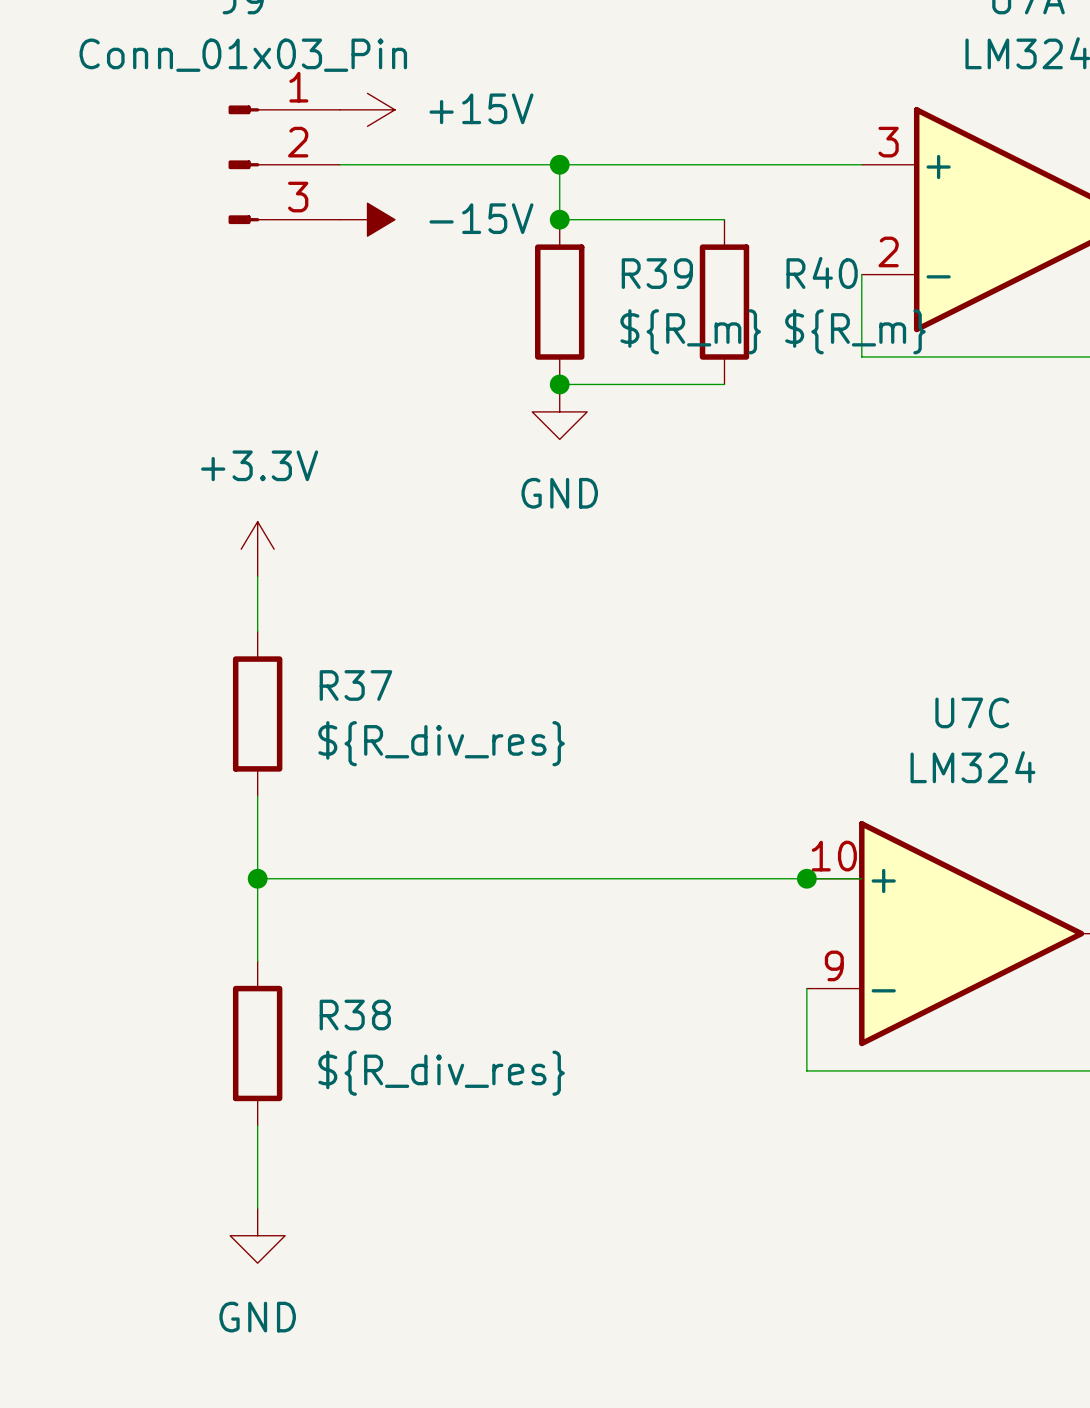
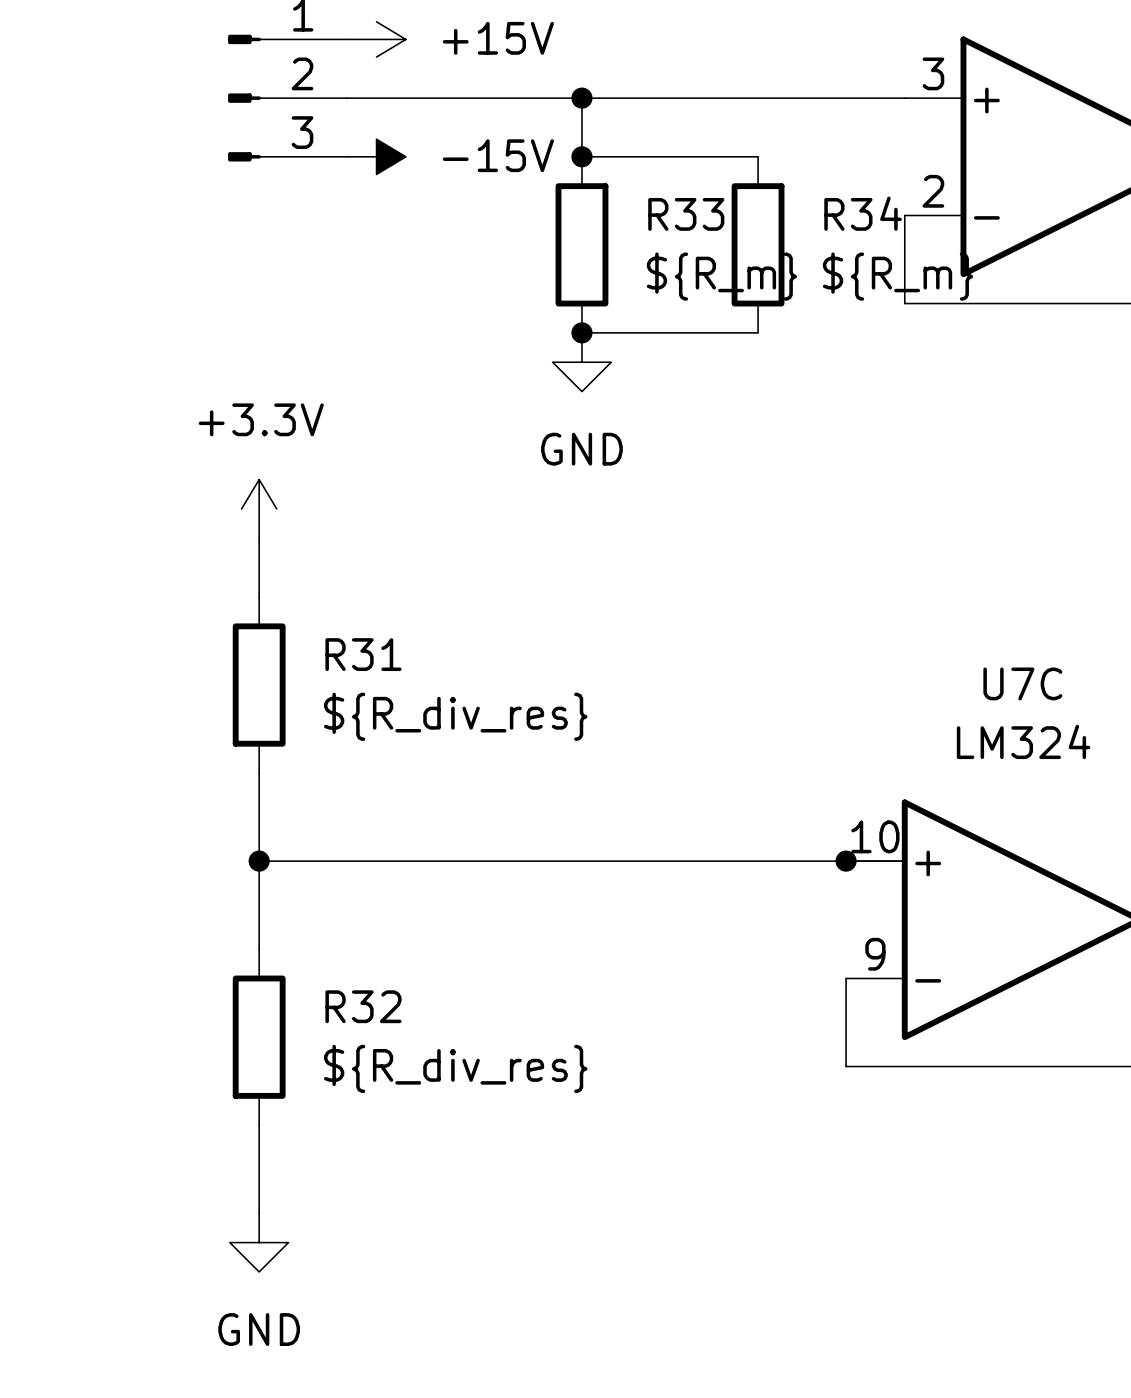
R40 name: R40 (822, 272) -> R34 (863, 213)
R39 name: R39 (657, 273) -> R33 (686, 214)
R37 name: R37 (355, 685) -> R31 (363, 654)
R38 name: R38 (355, 1015) -> R32 (363, 1006)

